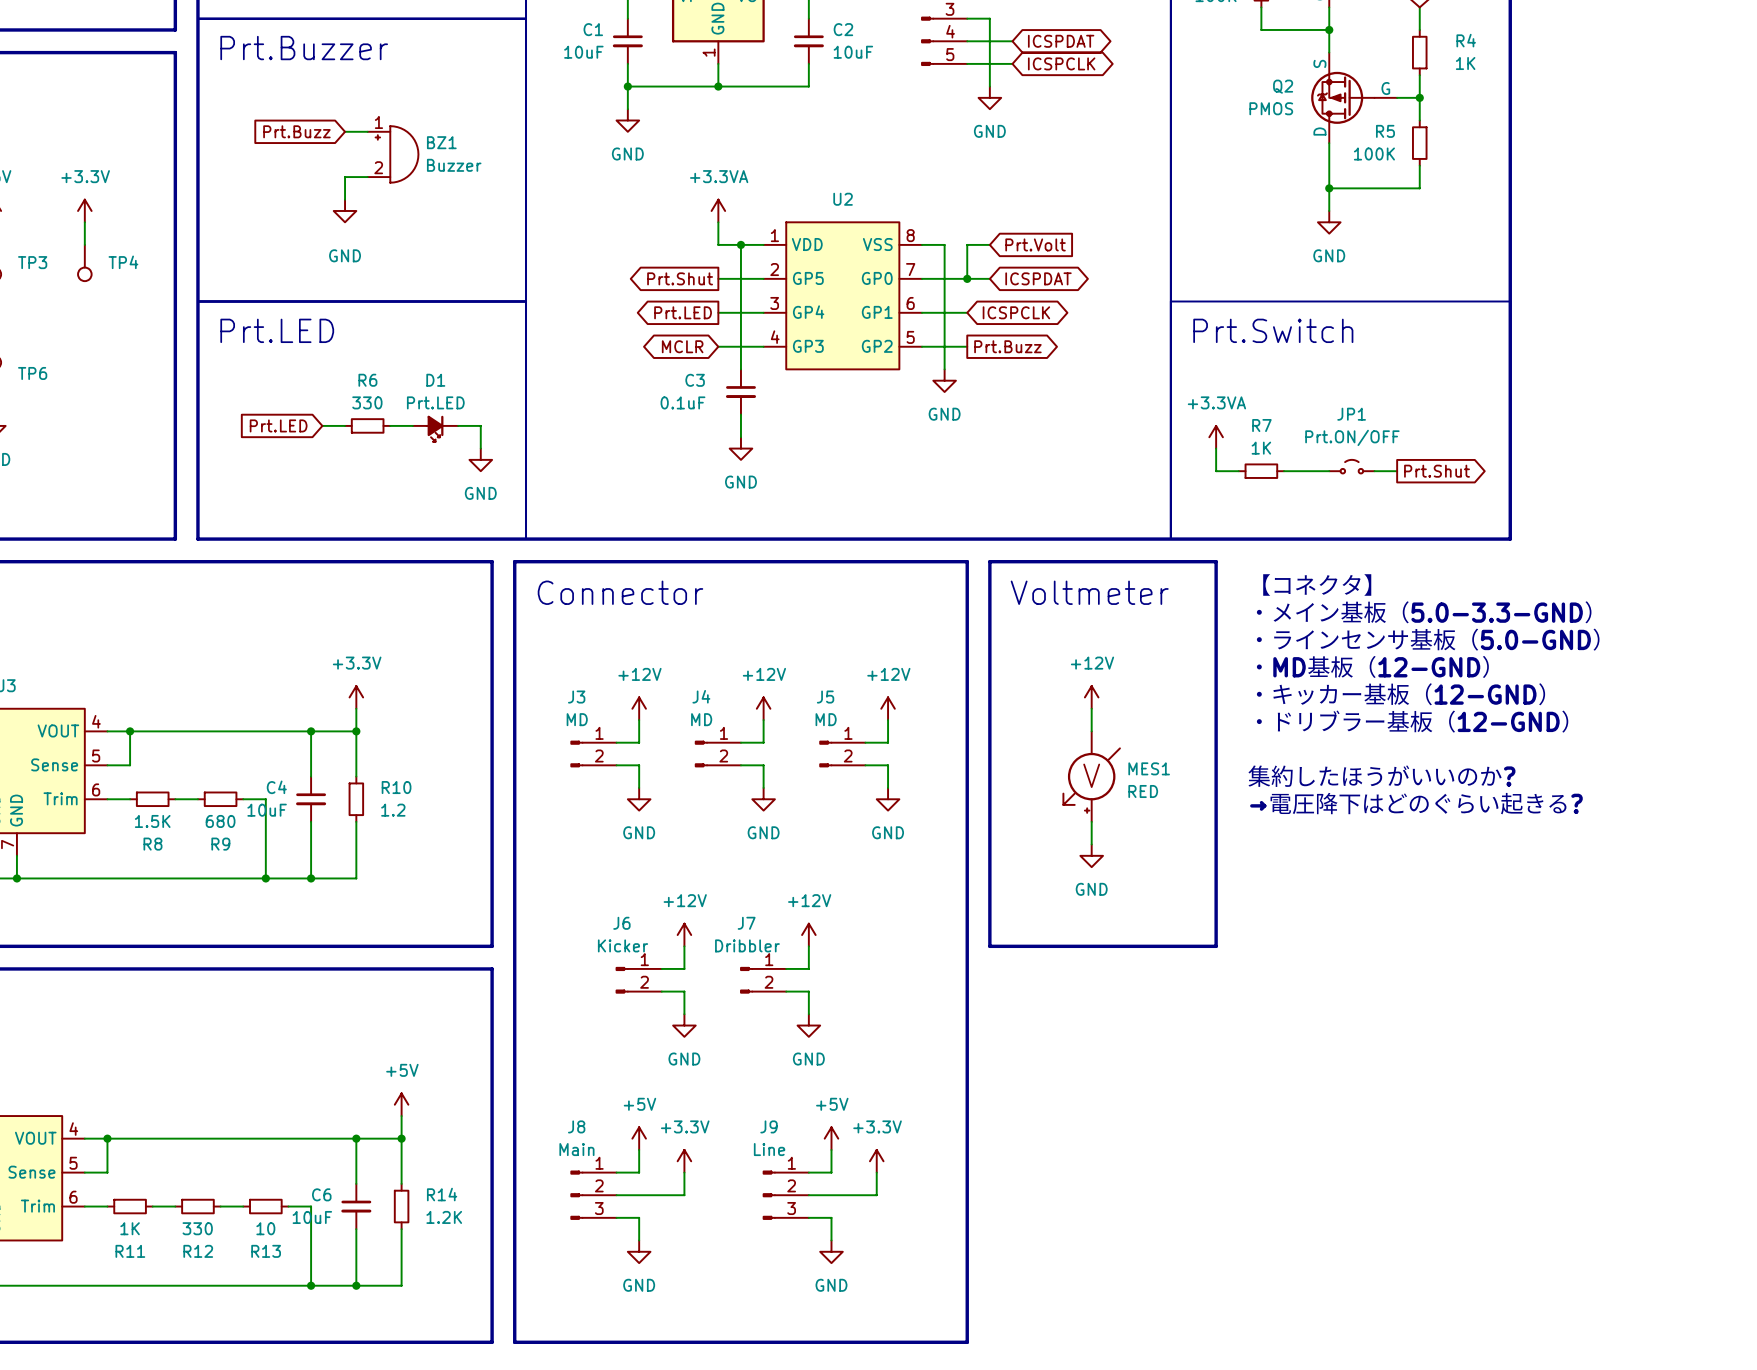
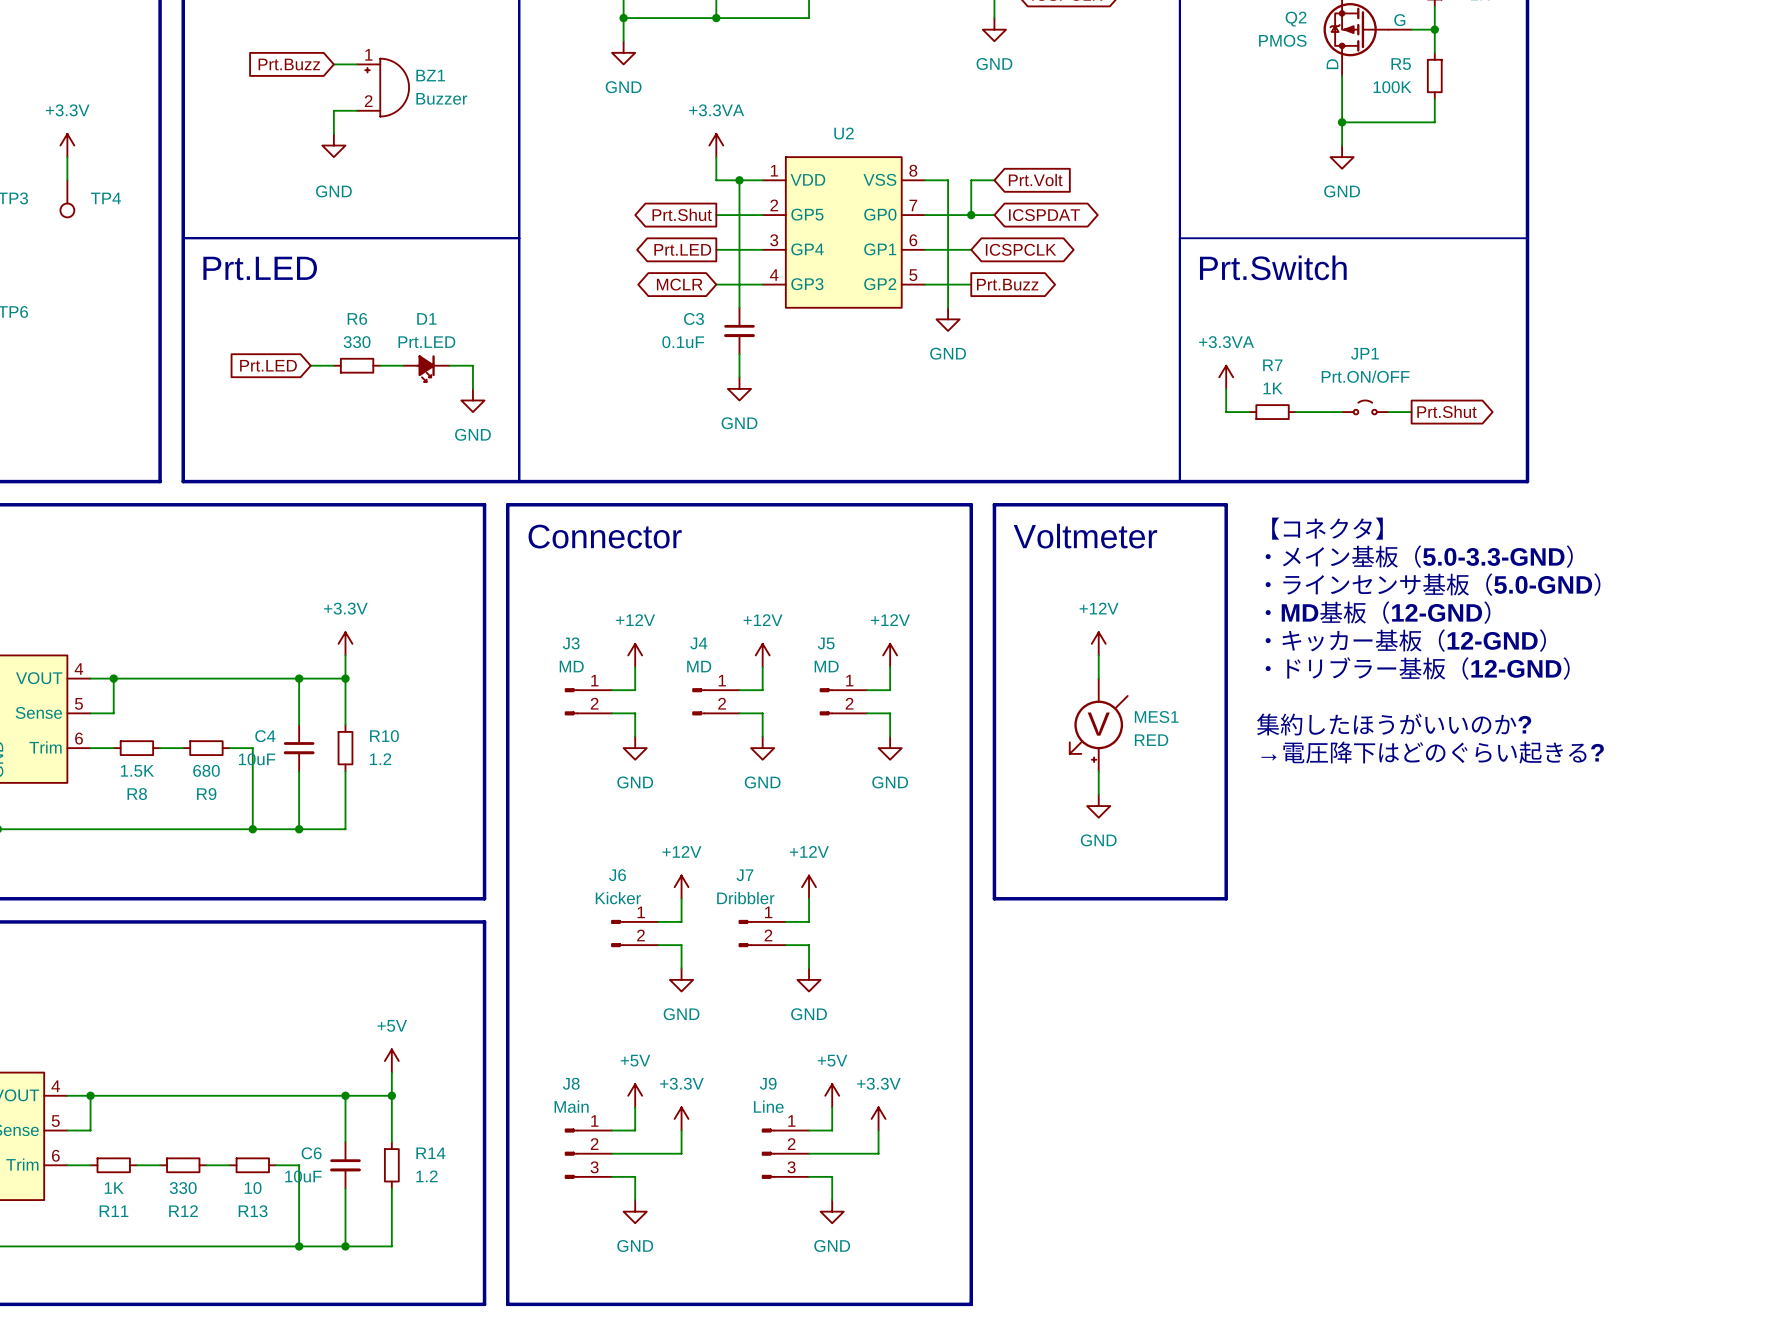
R14 value: 1.2K (444, 1217) -> 1.2 (426, 1176)

